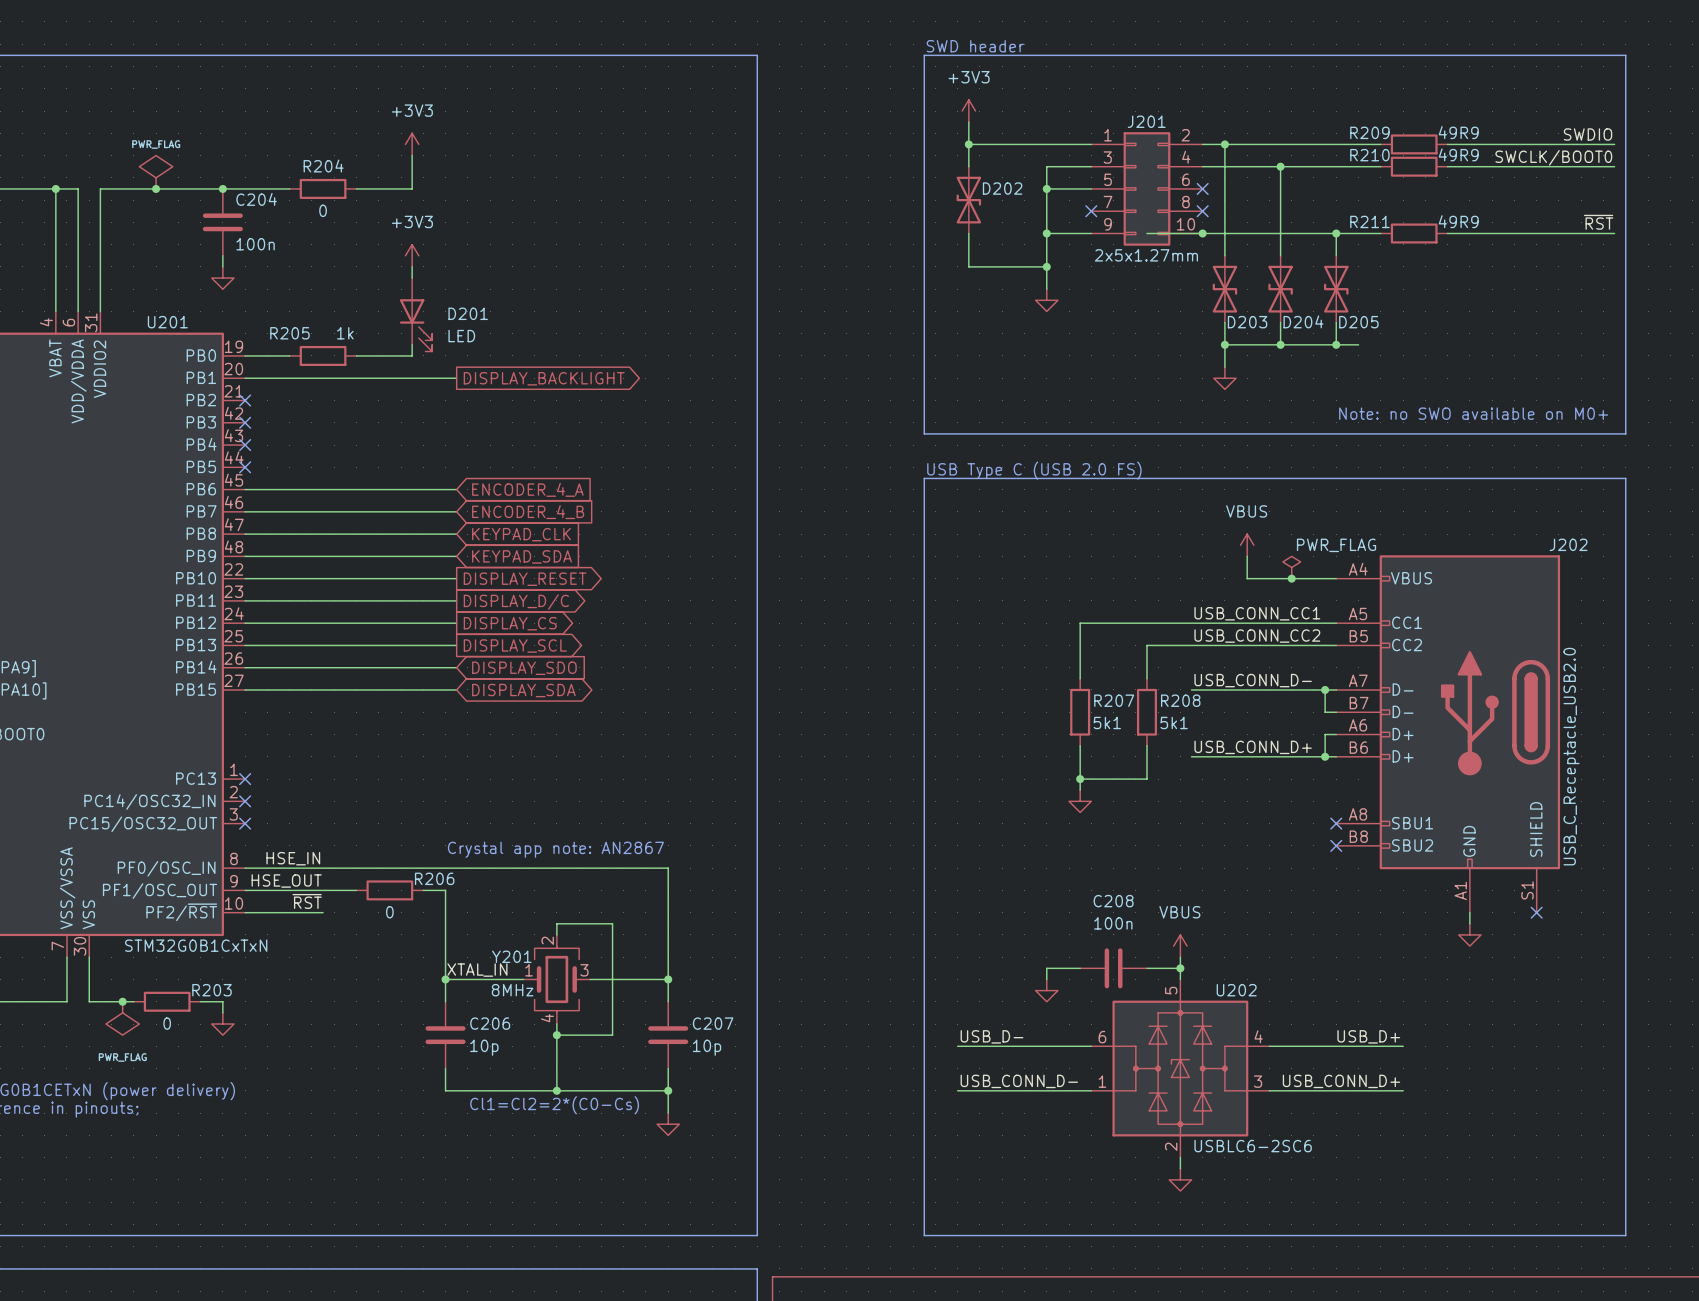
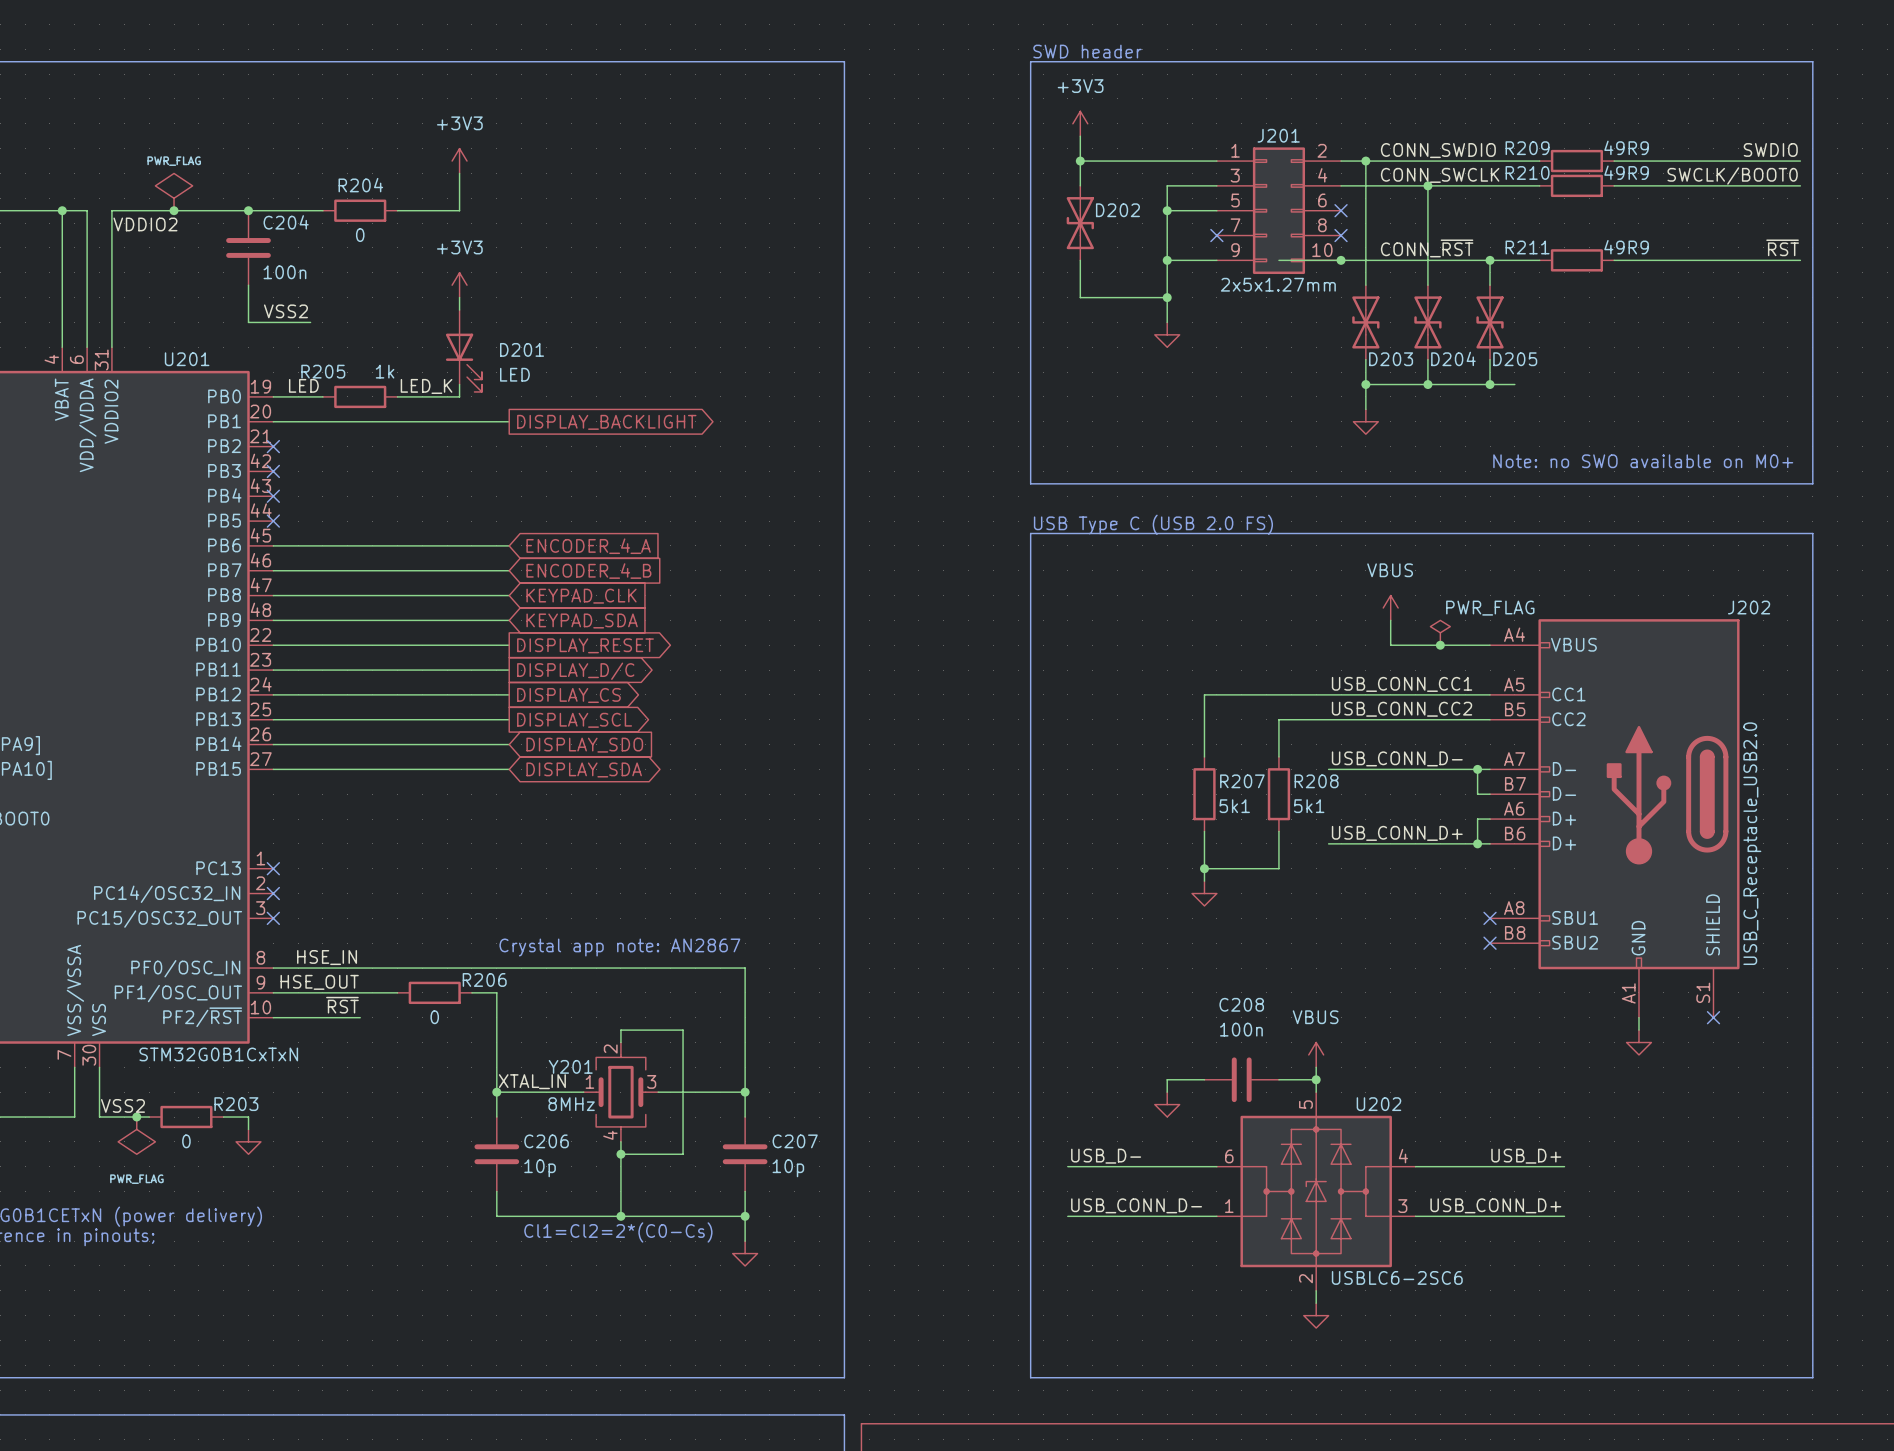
label: none -> CONN_SWDIO (1438, 150)
label: none -> CONN_SWCLK (1440, 175)
label: none -> VDDIO2 (145, 224)
label: none -> CONN_~{RST} (1427, 248)
wire: none -> (248, 297) (248, 322) (310, 322)
power symbol: (222, 278) -> none
label: none -> VSS2 (285, 311)
label: none -> LED (303, 385)
label: none -> LED_K (426, 386)
label: none -> VSS2 (122, 1105)

